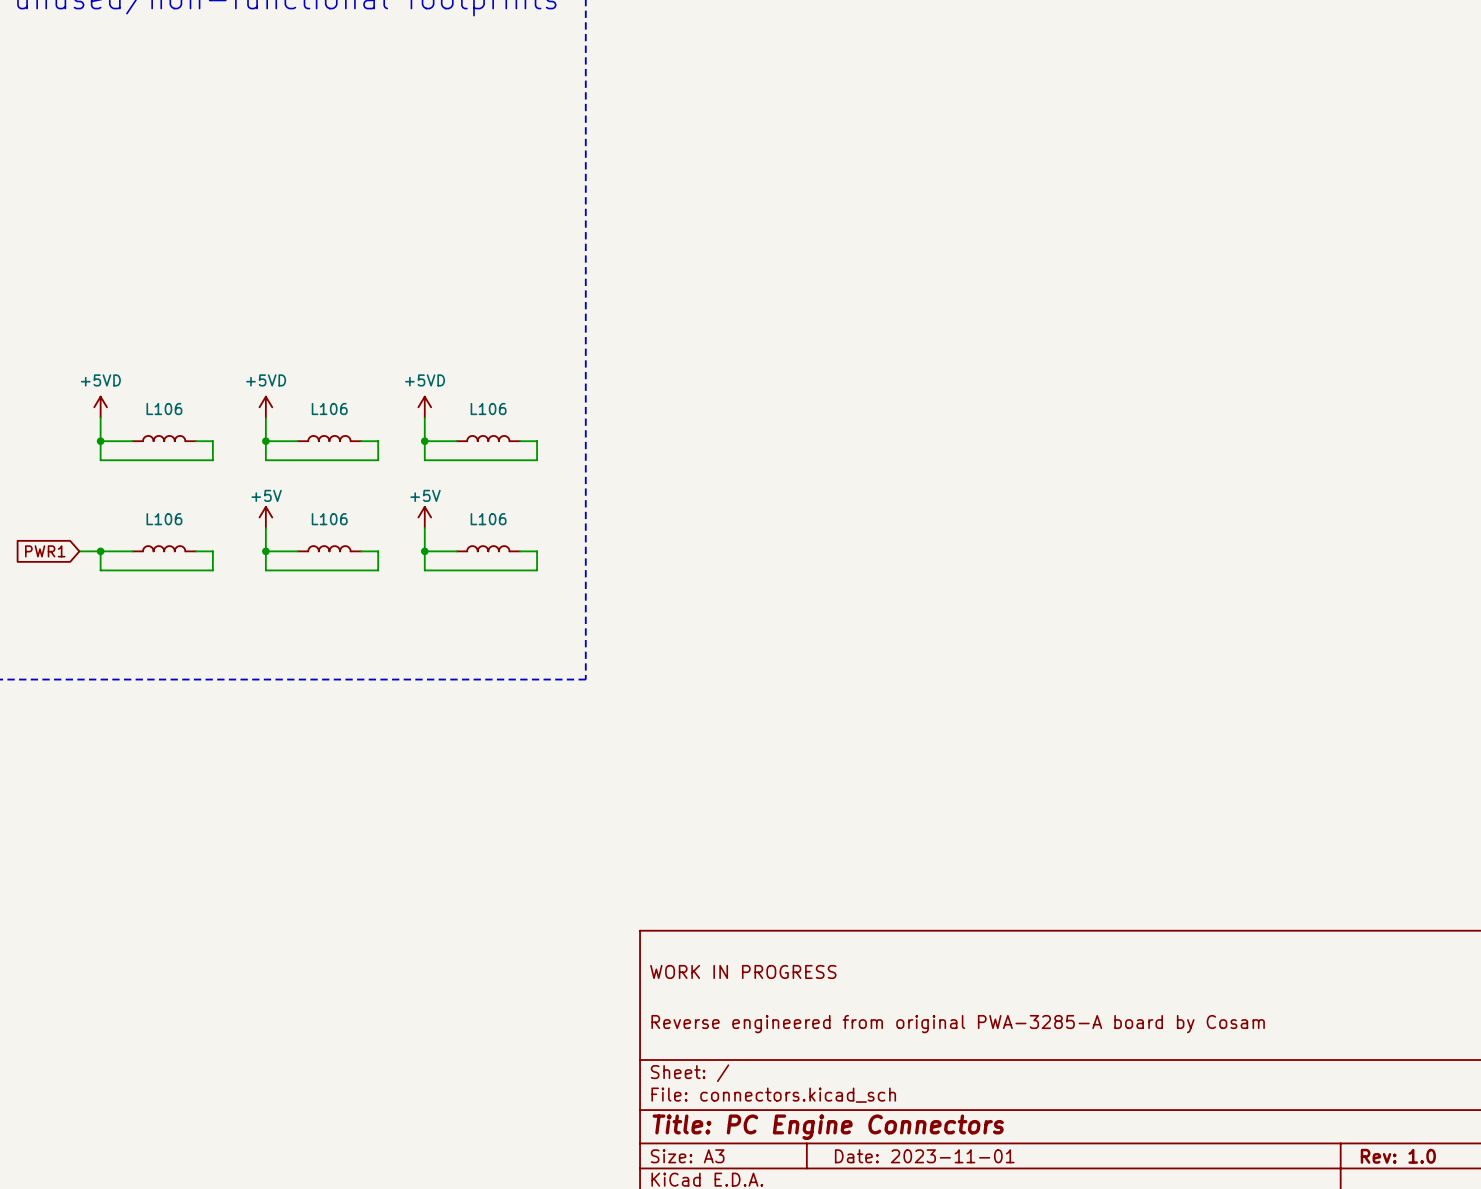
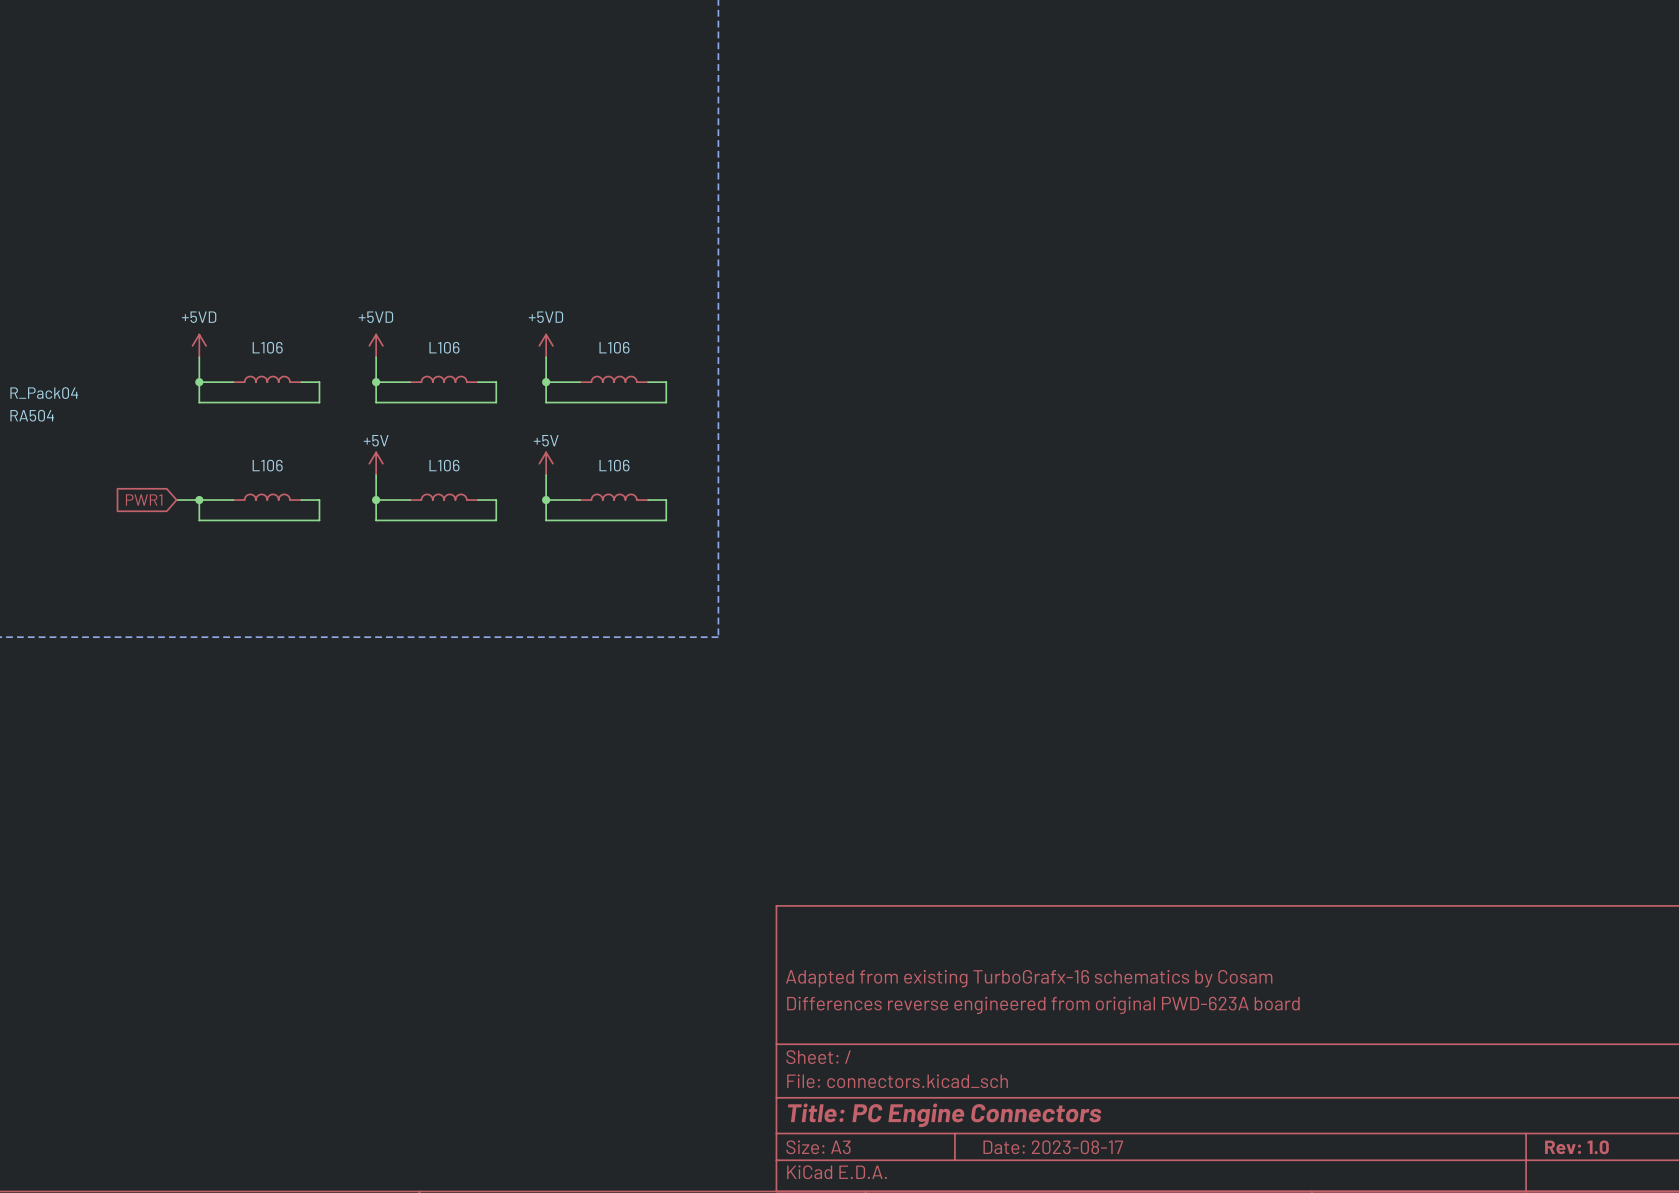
title block: WORK IN PROGRESS (743, 971) -> none
title block: none -> Adapted from existing TurboGrafx-16 schematics by Cosam (1029, 978)
title block: Reverse engineered from original PWA-3285-A board by Cosam (958, 1024) -> Differences reverse engineered from original PWD-623A board (1043, 1005)
title block: Date: 2023-11-01 (924, 1156) -> Date: 2023-08-17 (1053, 1147)

